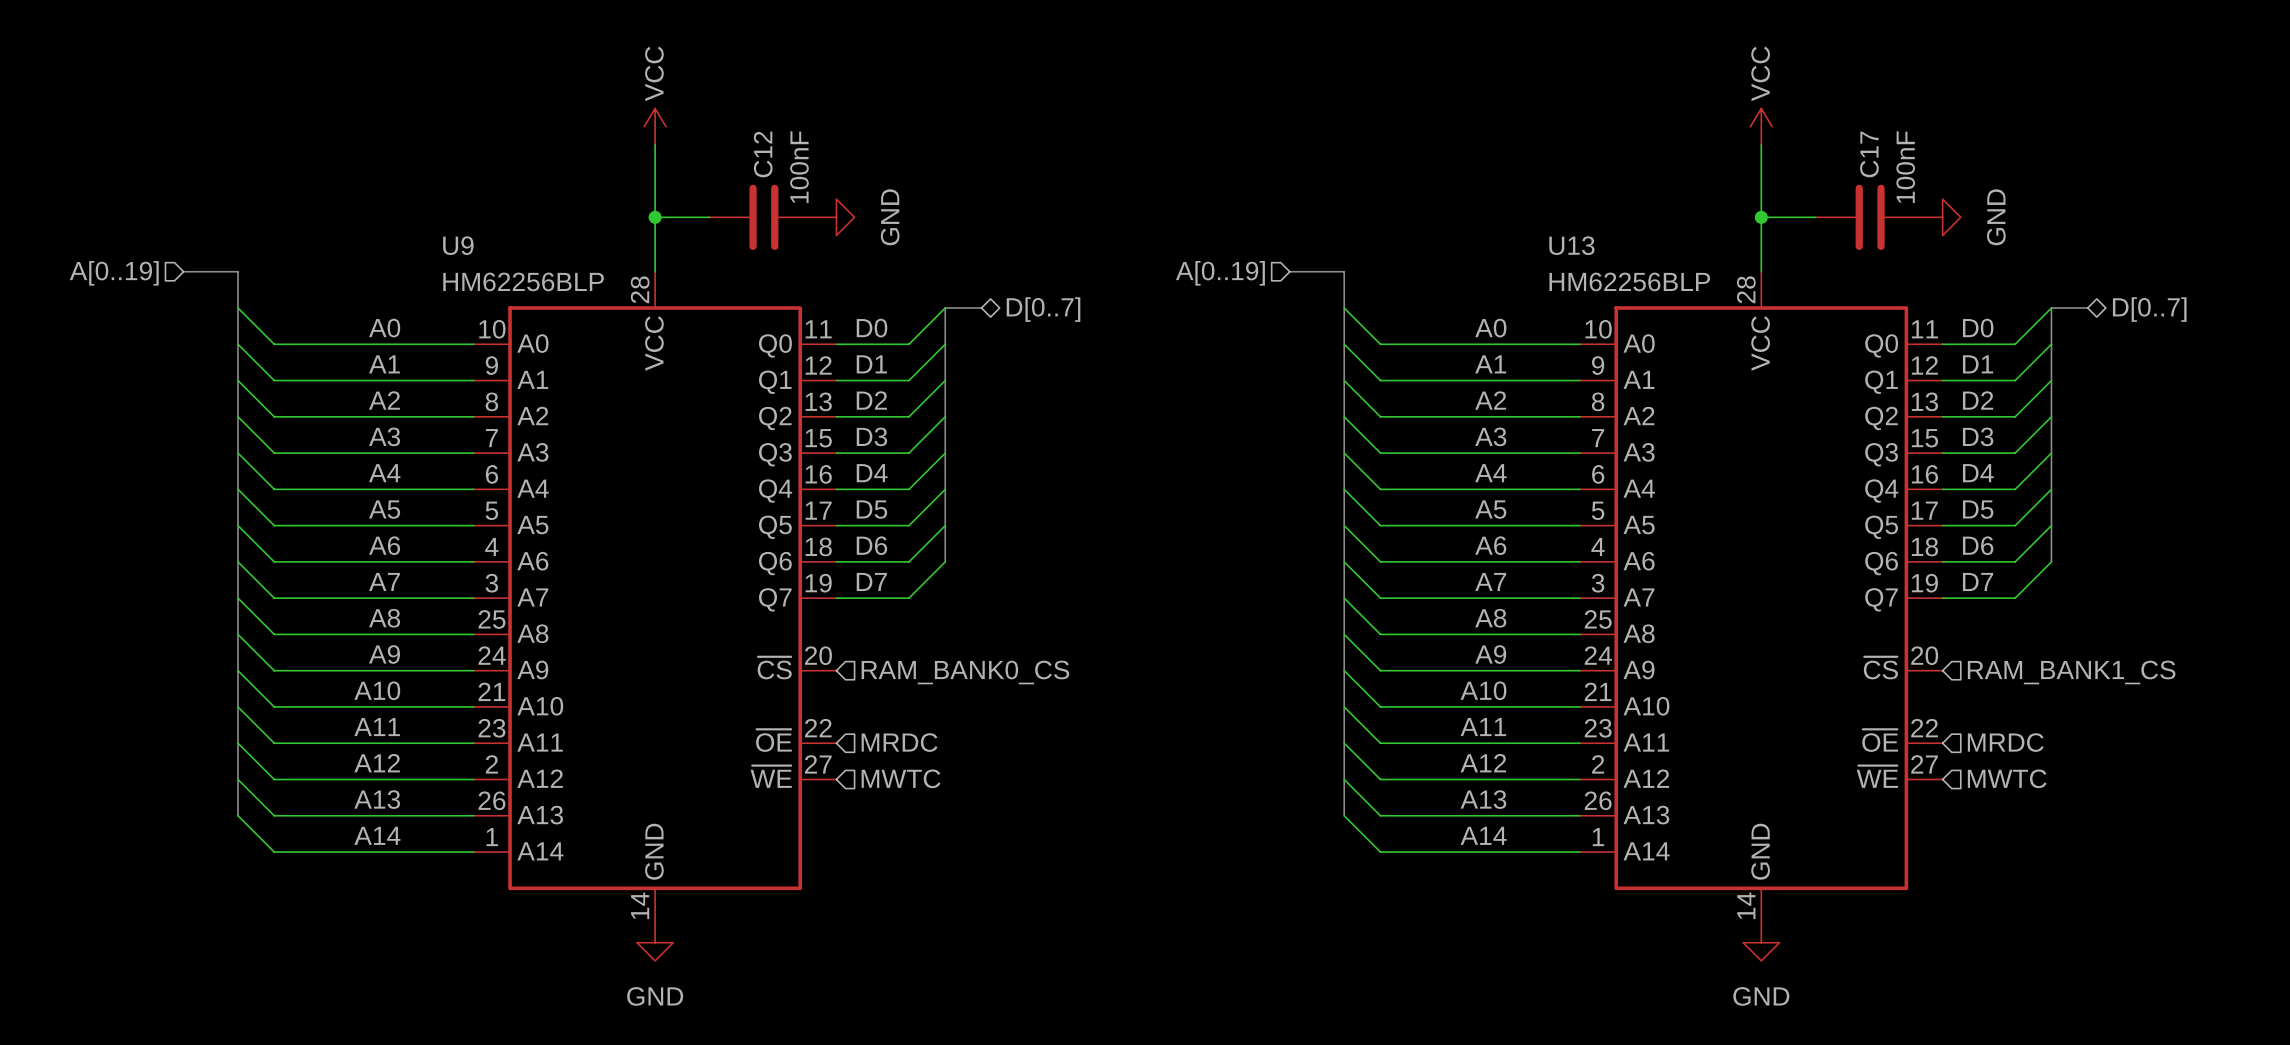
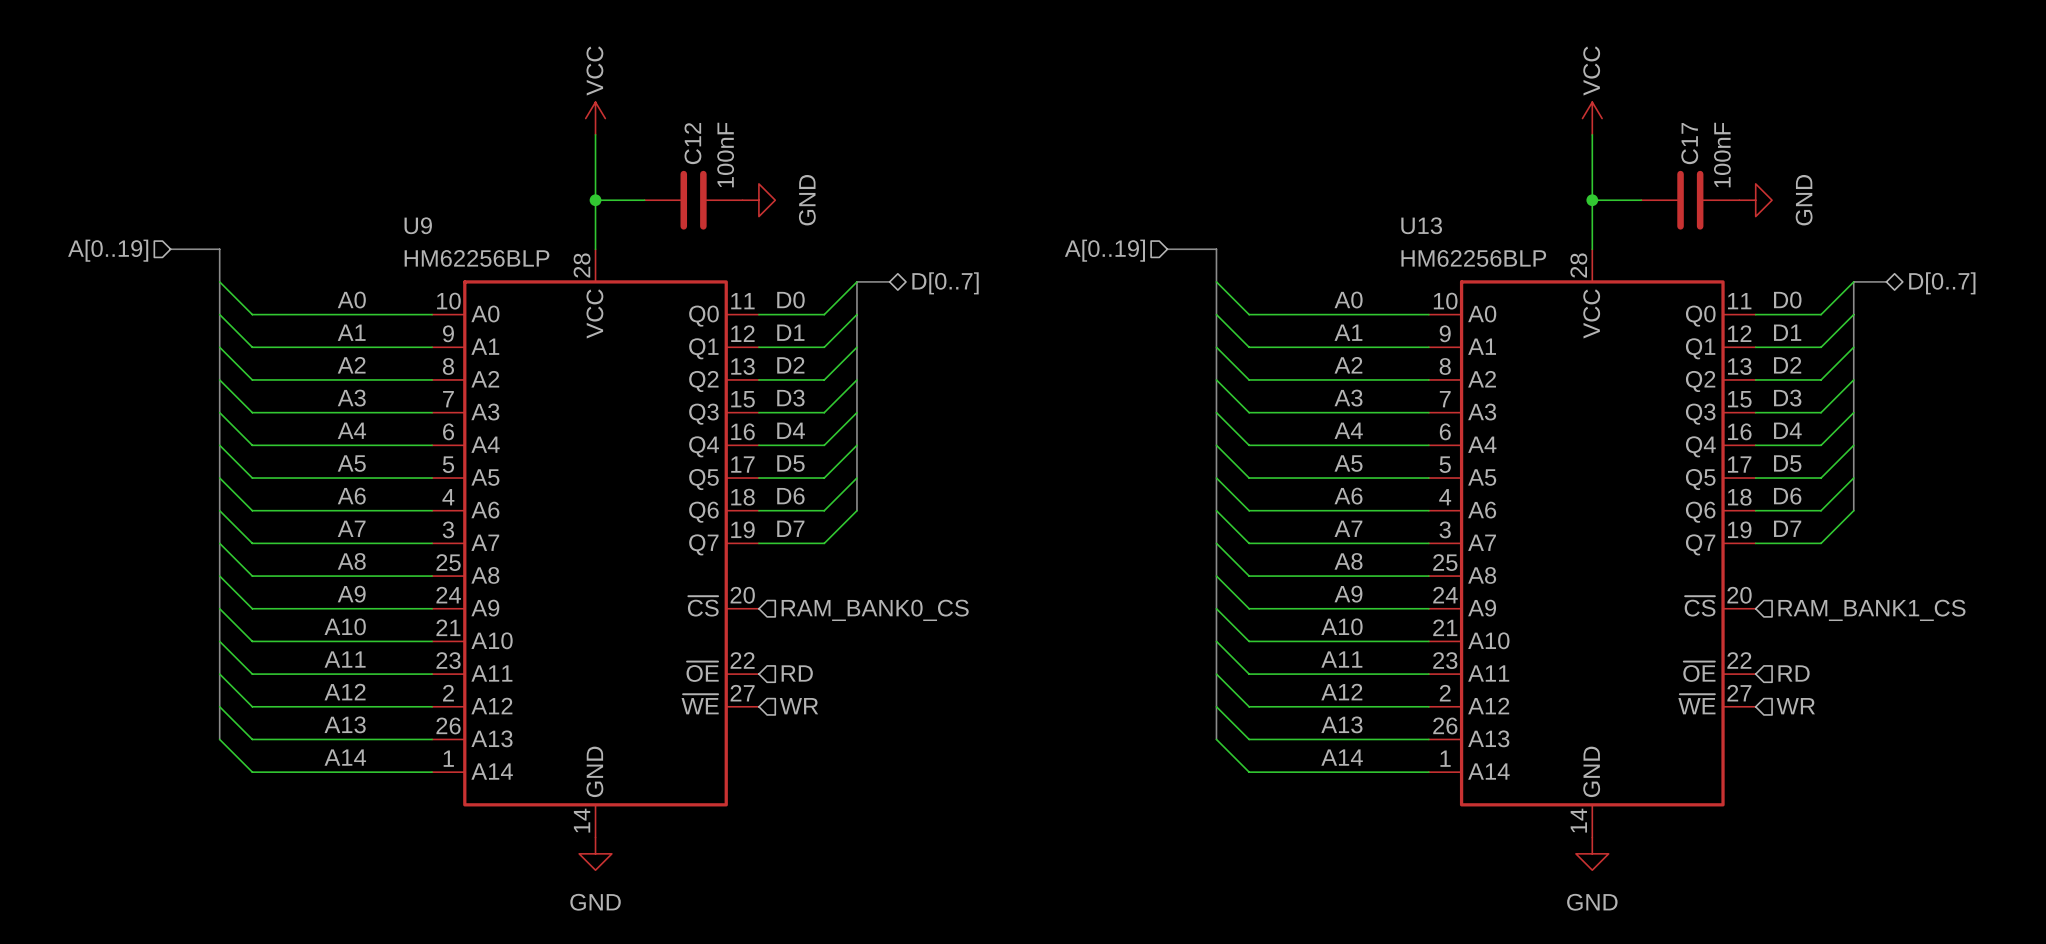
hierarchical label: MRDC (899, 742) -> RD (797, 673)
hierarchical label: MRDC (2005, 742) -> RD (1794, 673)
hierarchical label: MWTC (901, 778) -> WR (798, 706)
hierarchical label: MWTC (2007, 778) -> WR (1795, 706)

